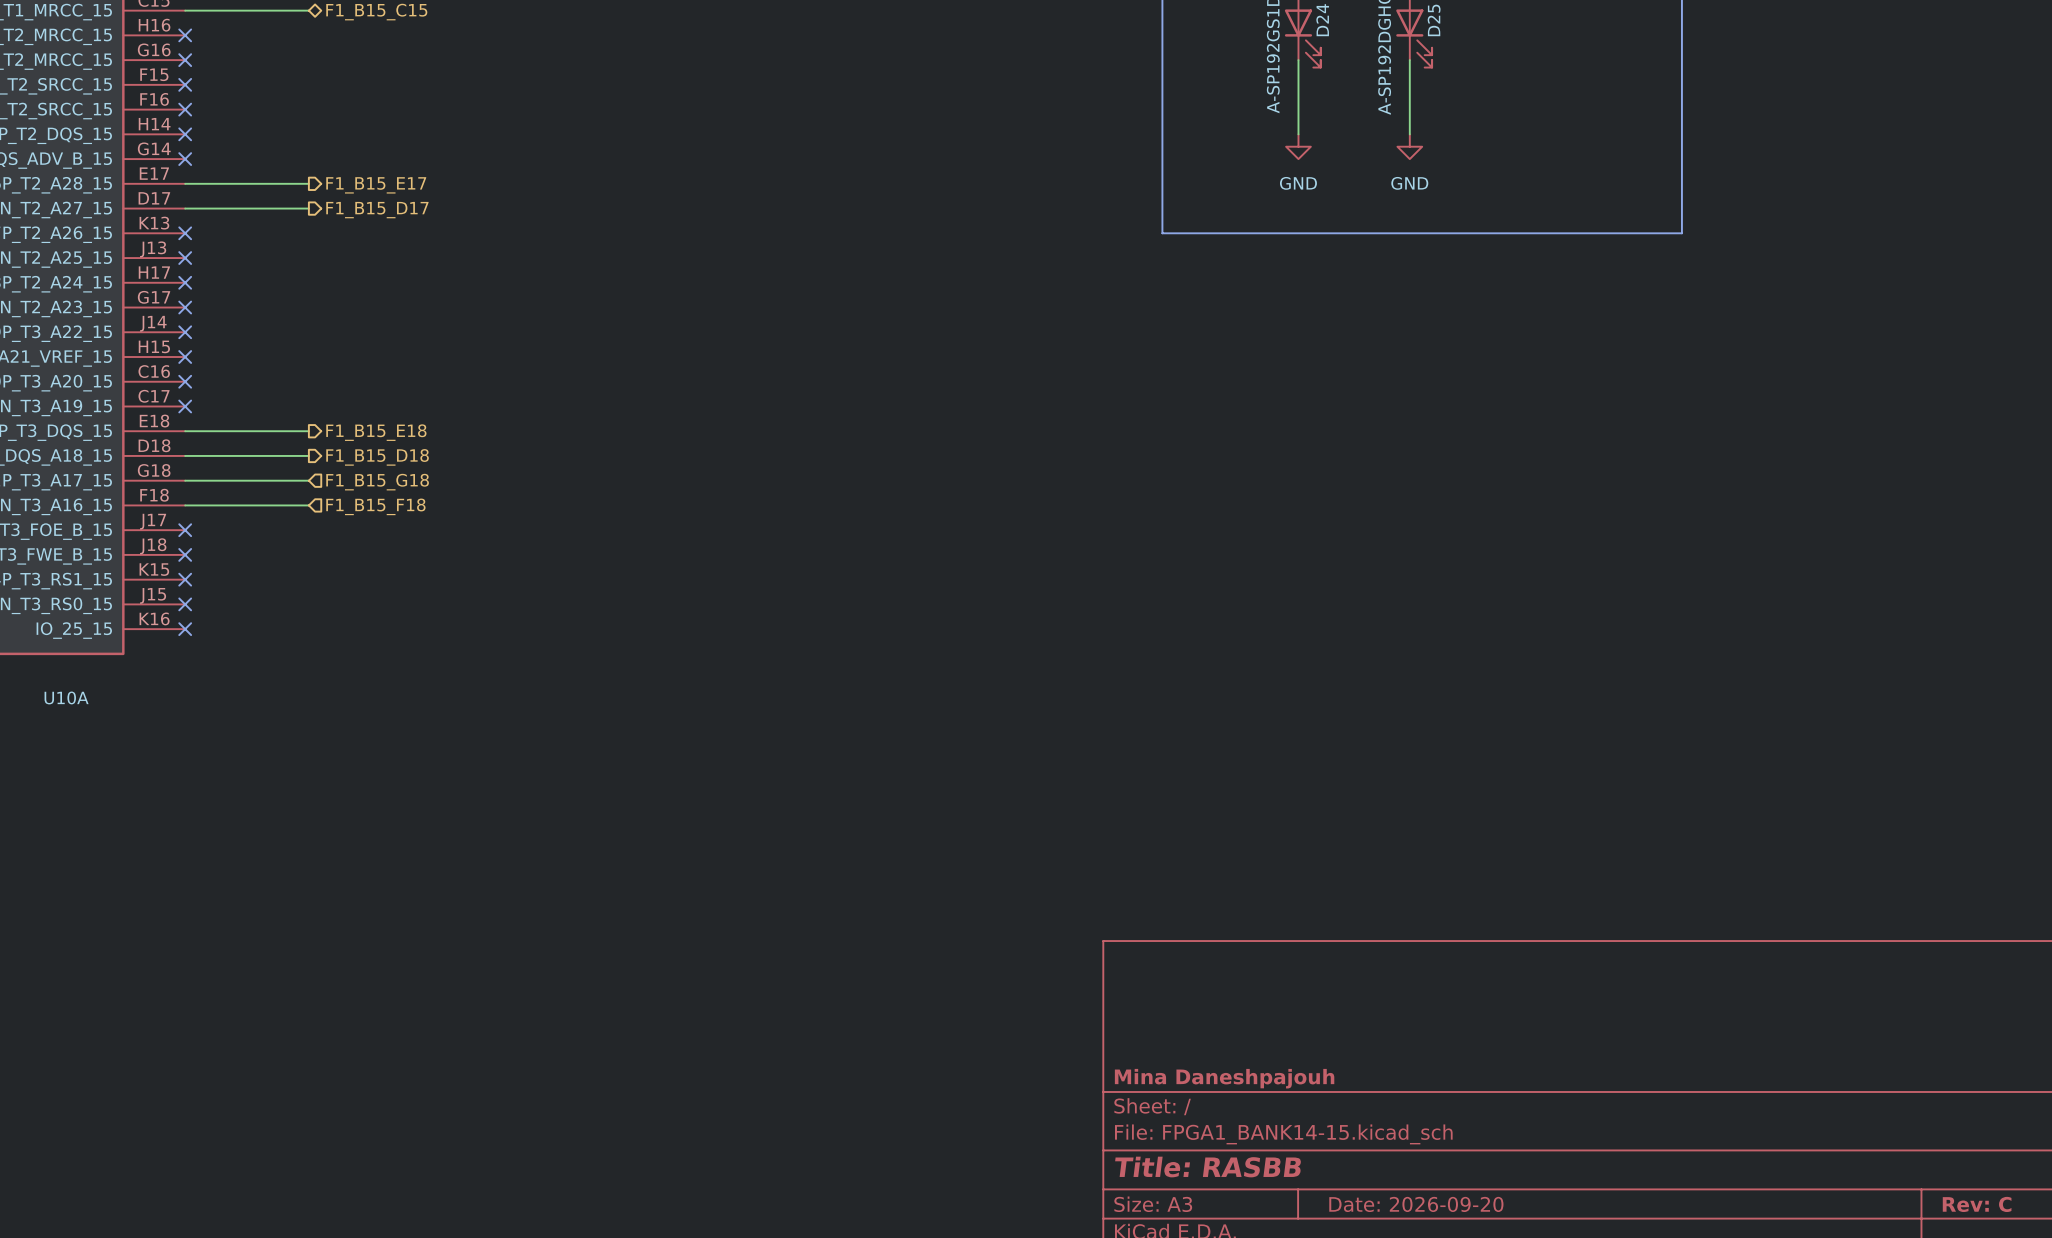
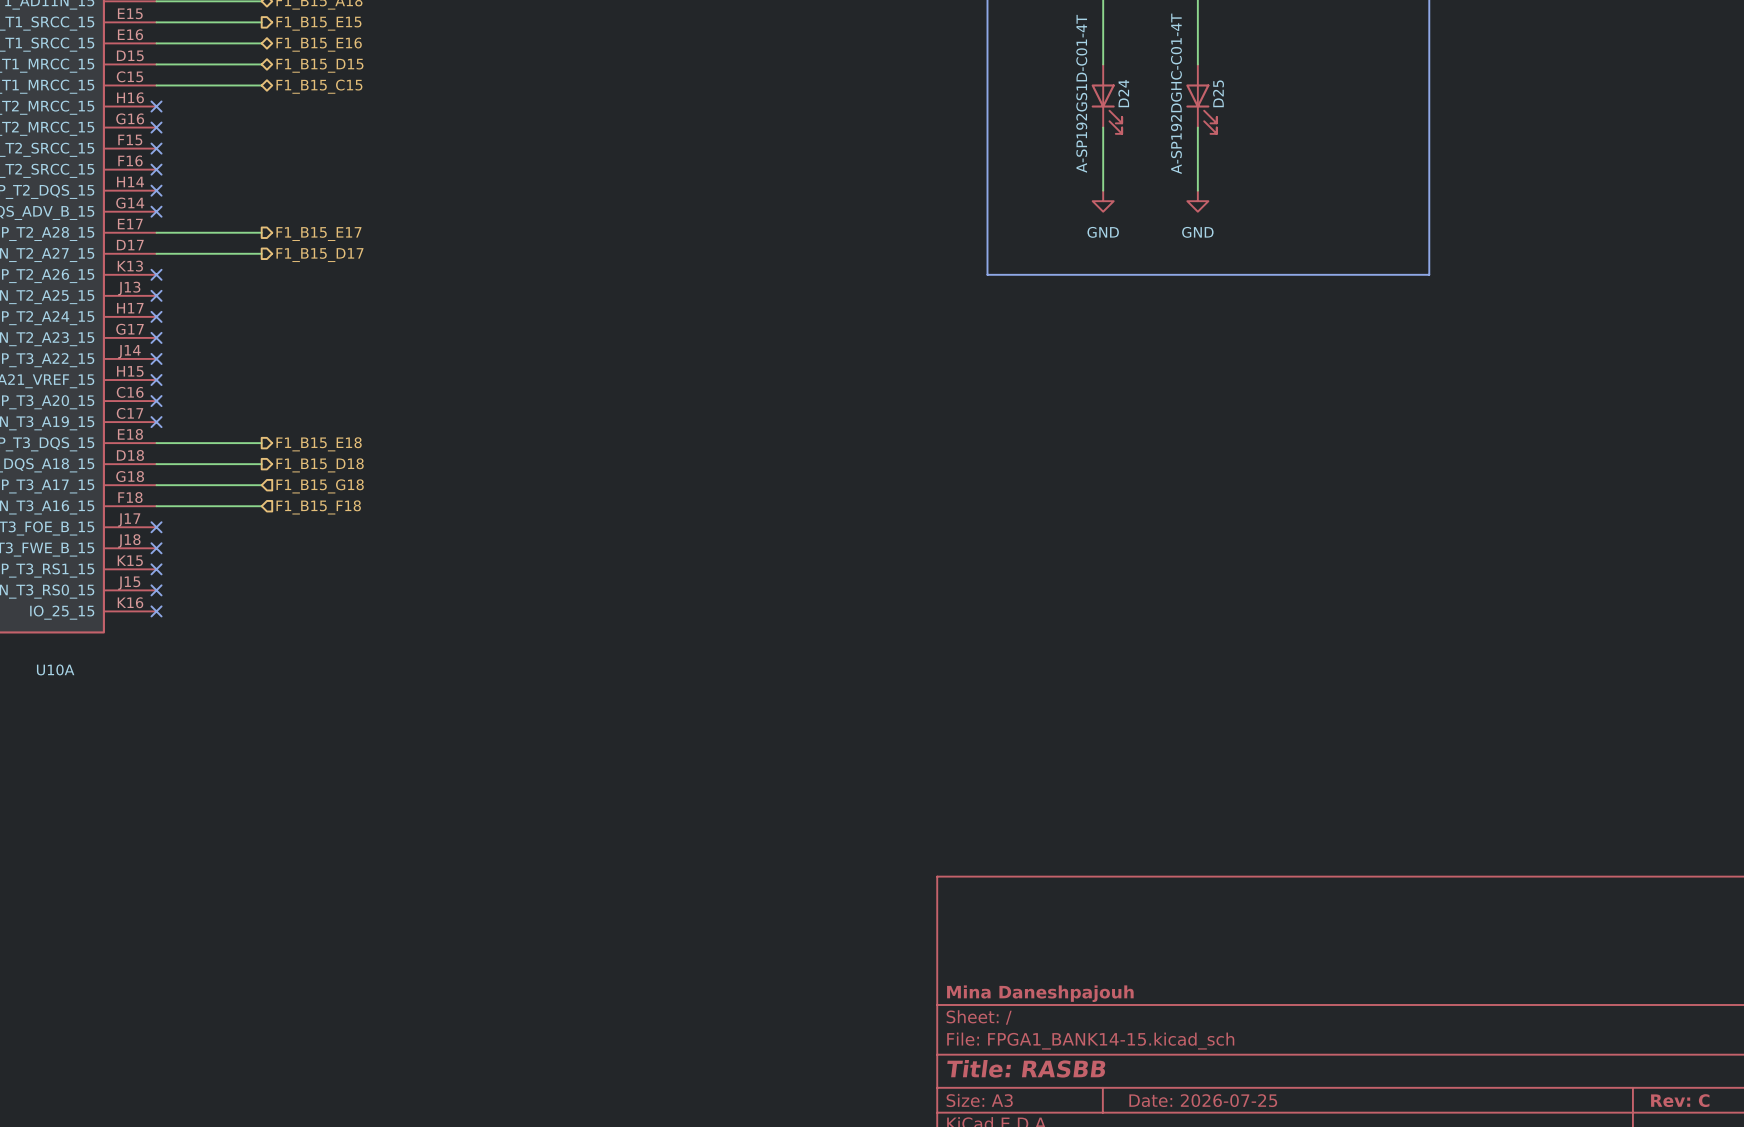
title block: Date: 2026-09-20 (1416, 1204) -> Date: 2026-07-25 (1203, 1100)

